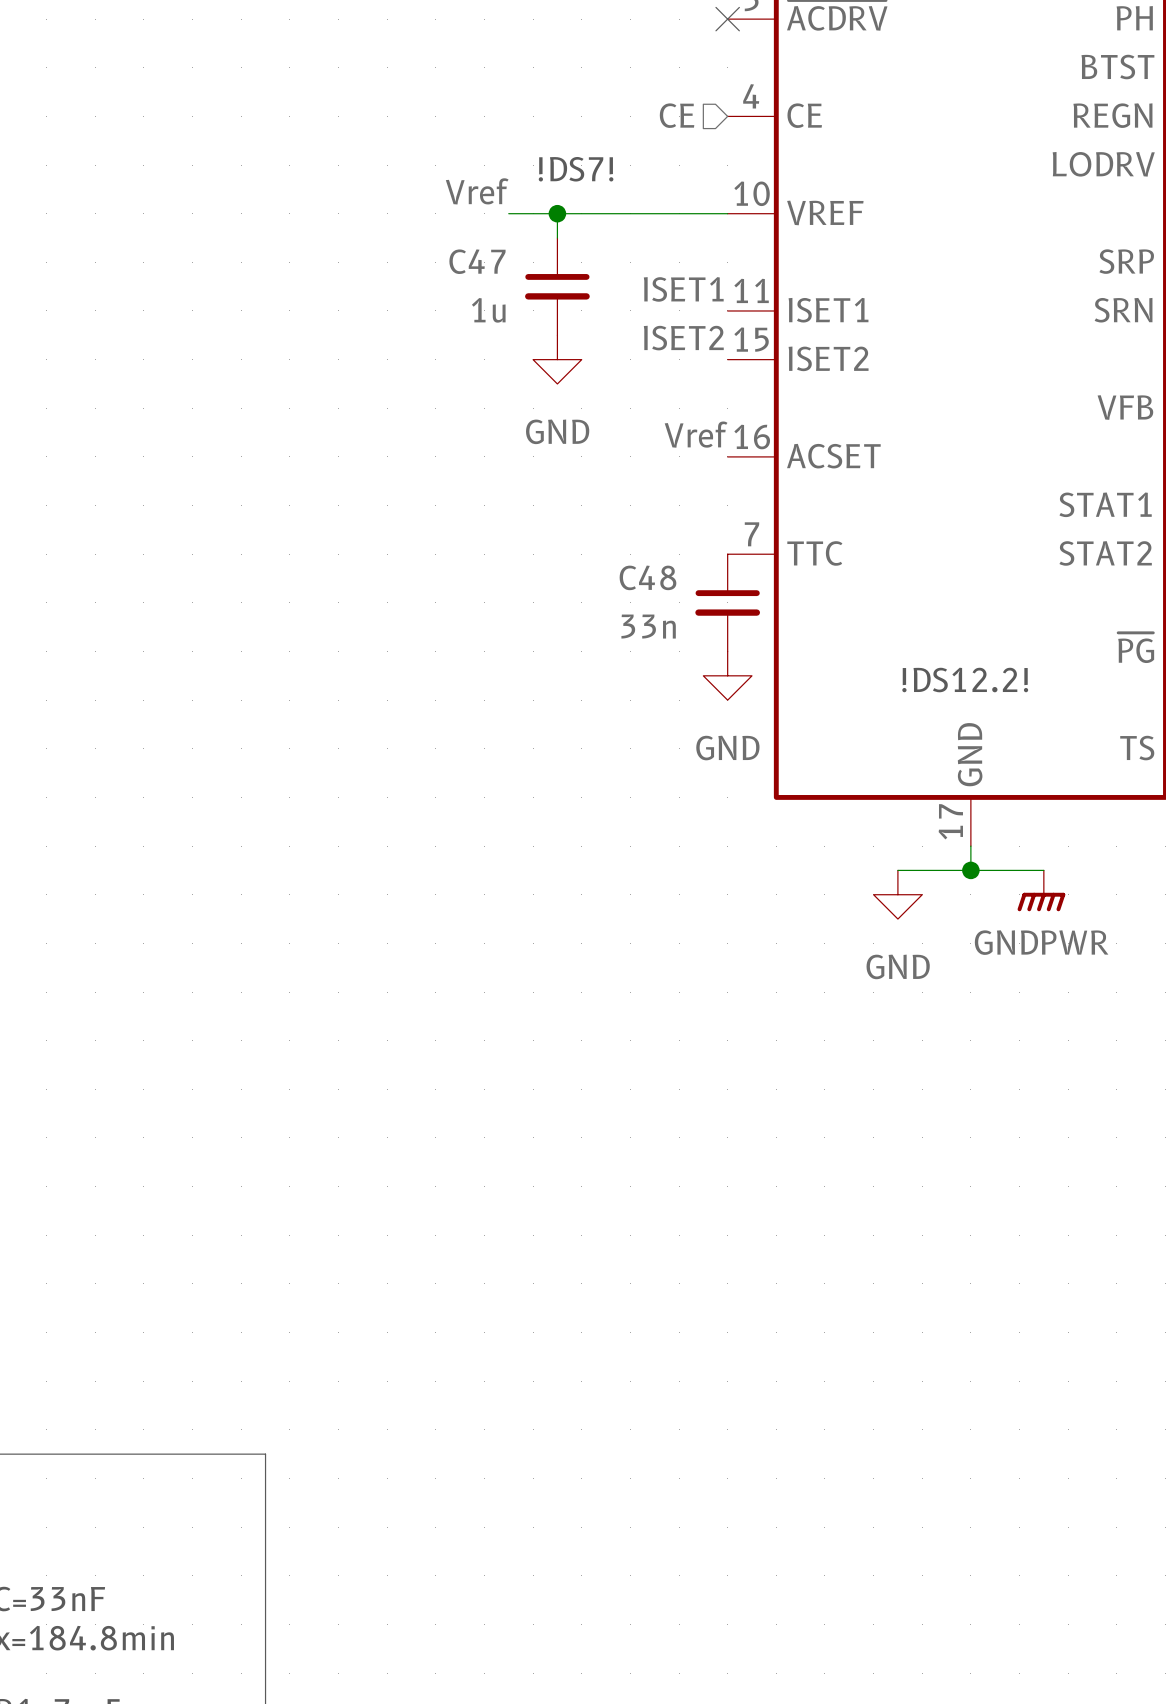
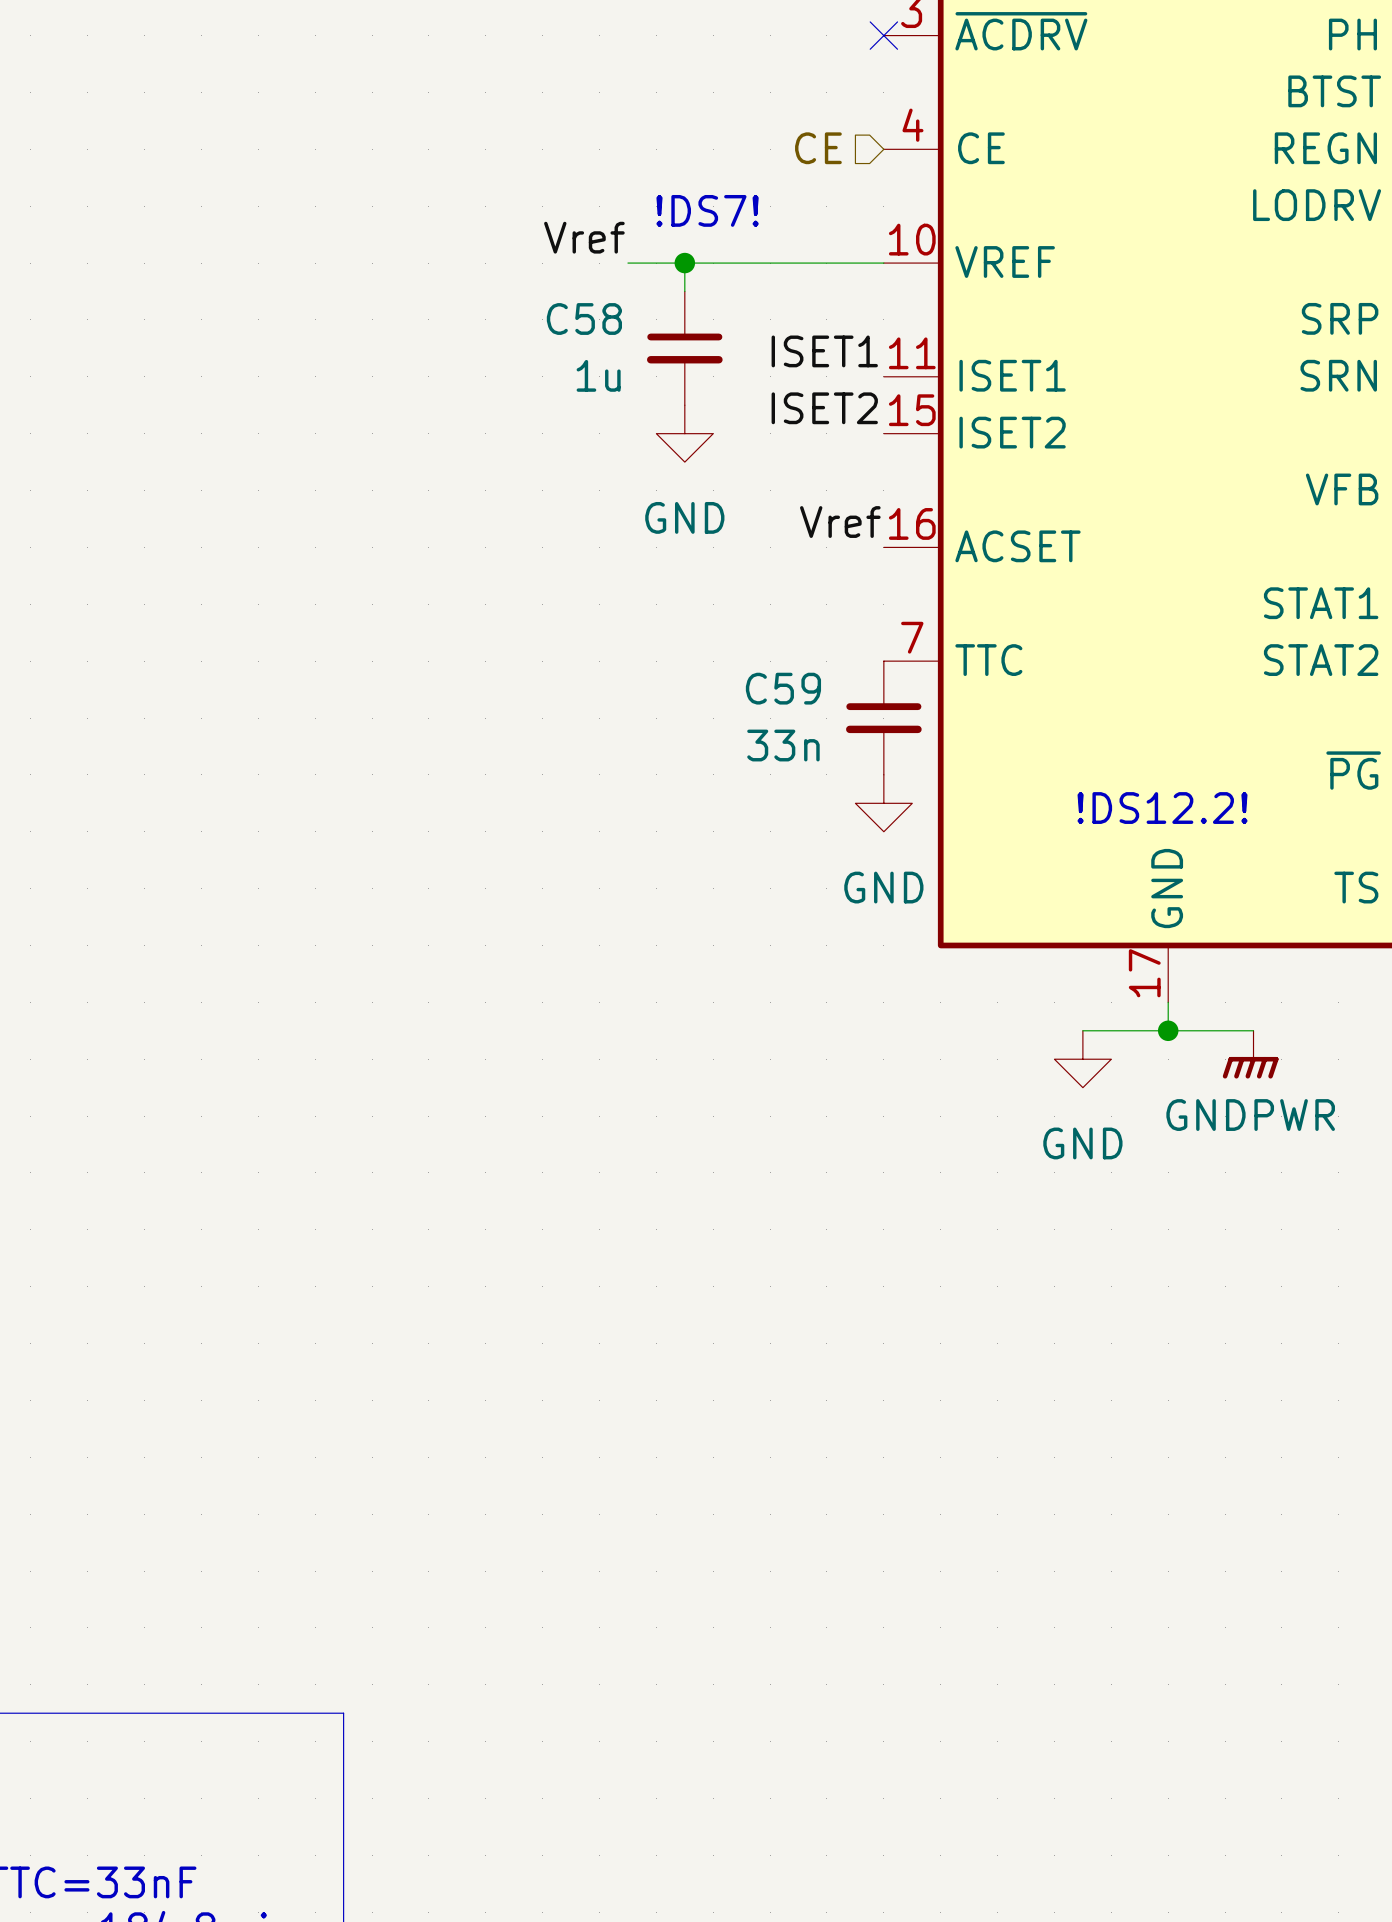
C47 name: C47 (477, 261) -> C58 (584, 319)
C48 name: C48 (647, 577) -> C59 (783, 688)

